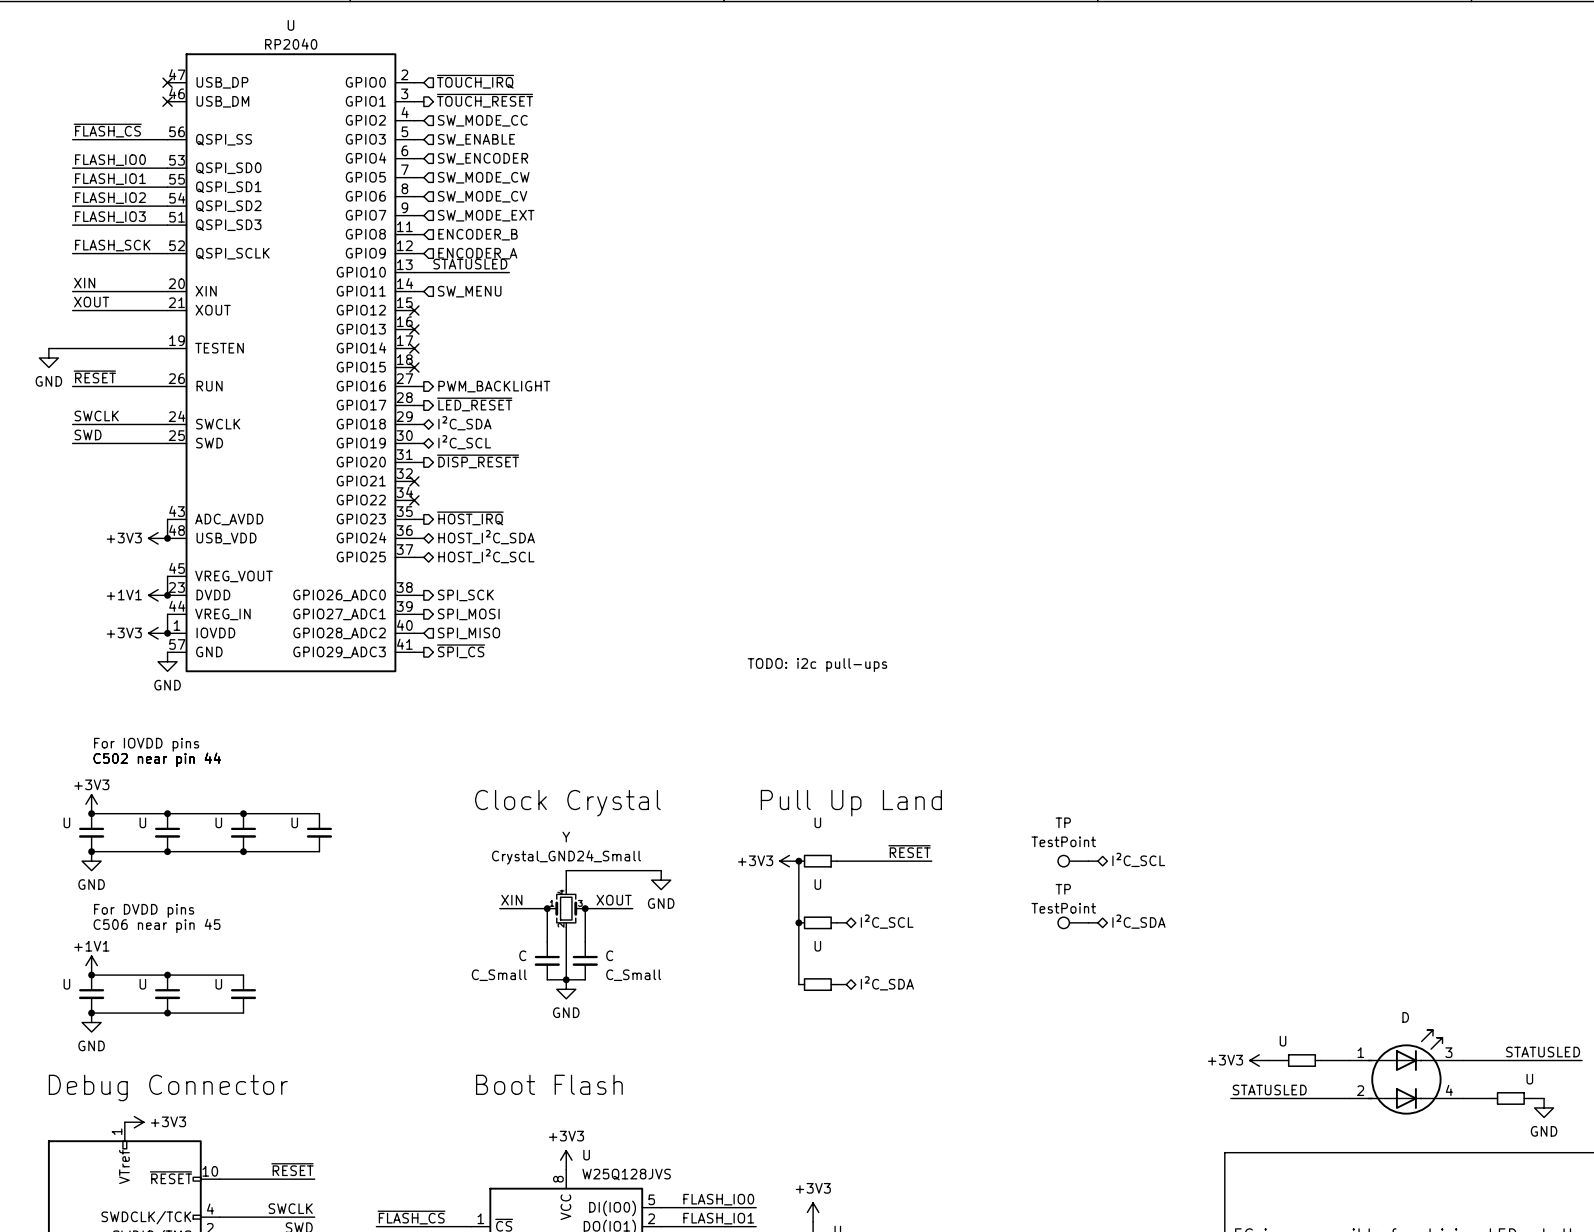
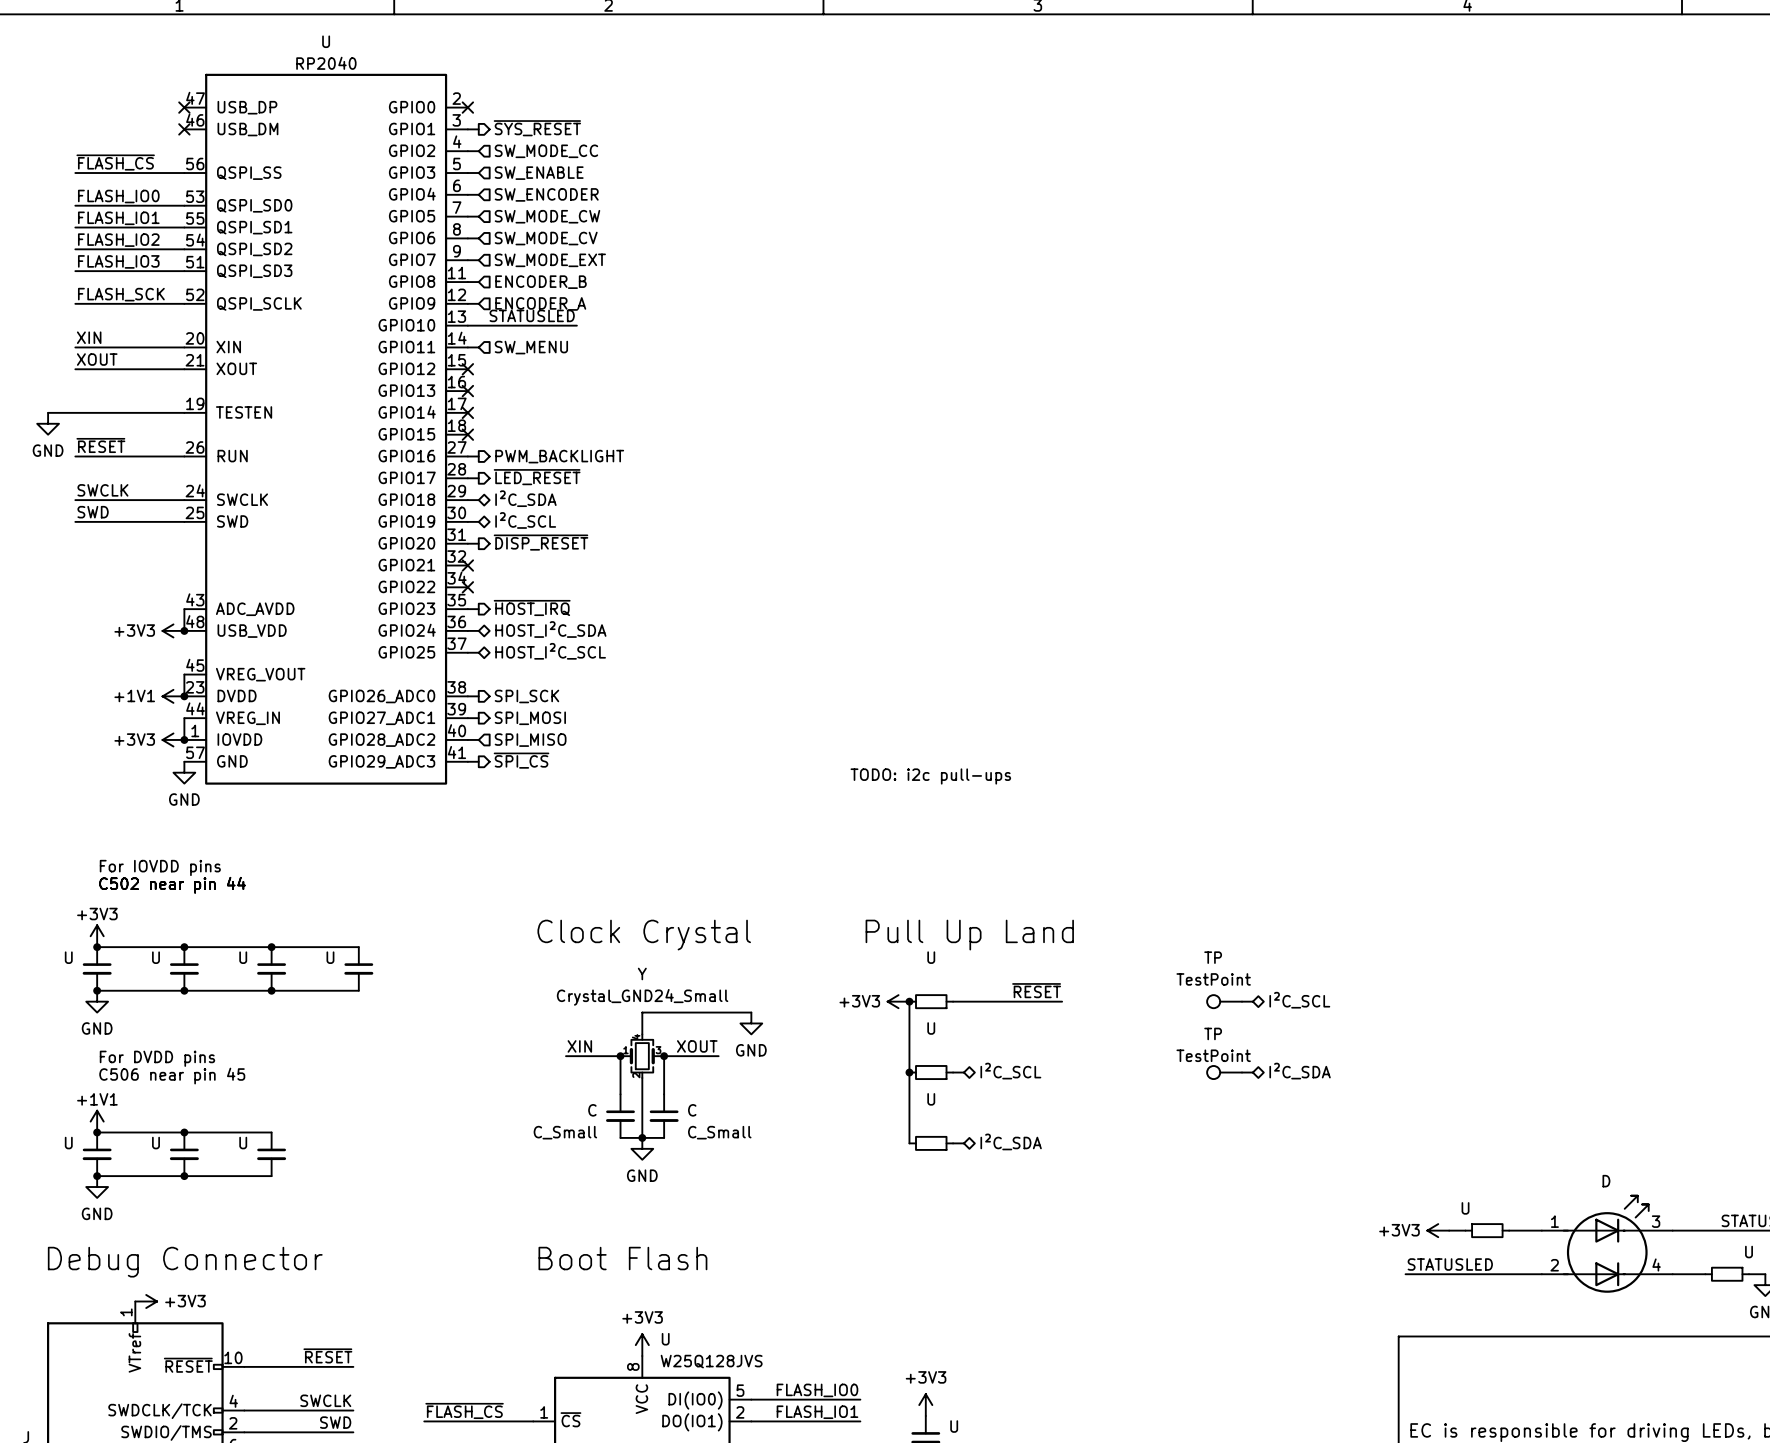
hierarchical label: ~{TOUCH_IRQ} (475, 81) -> none
wire: (414, 82) (423, 82) -> none
no-connect mark: none -> (467, 107)
hierarchical label: ~{TOUCH_RESET} (485, 100) -> ~{SYS_RESET} (537, 128)

